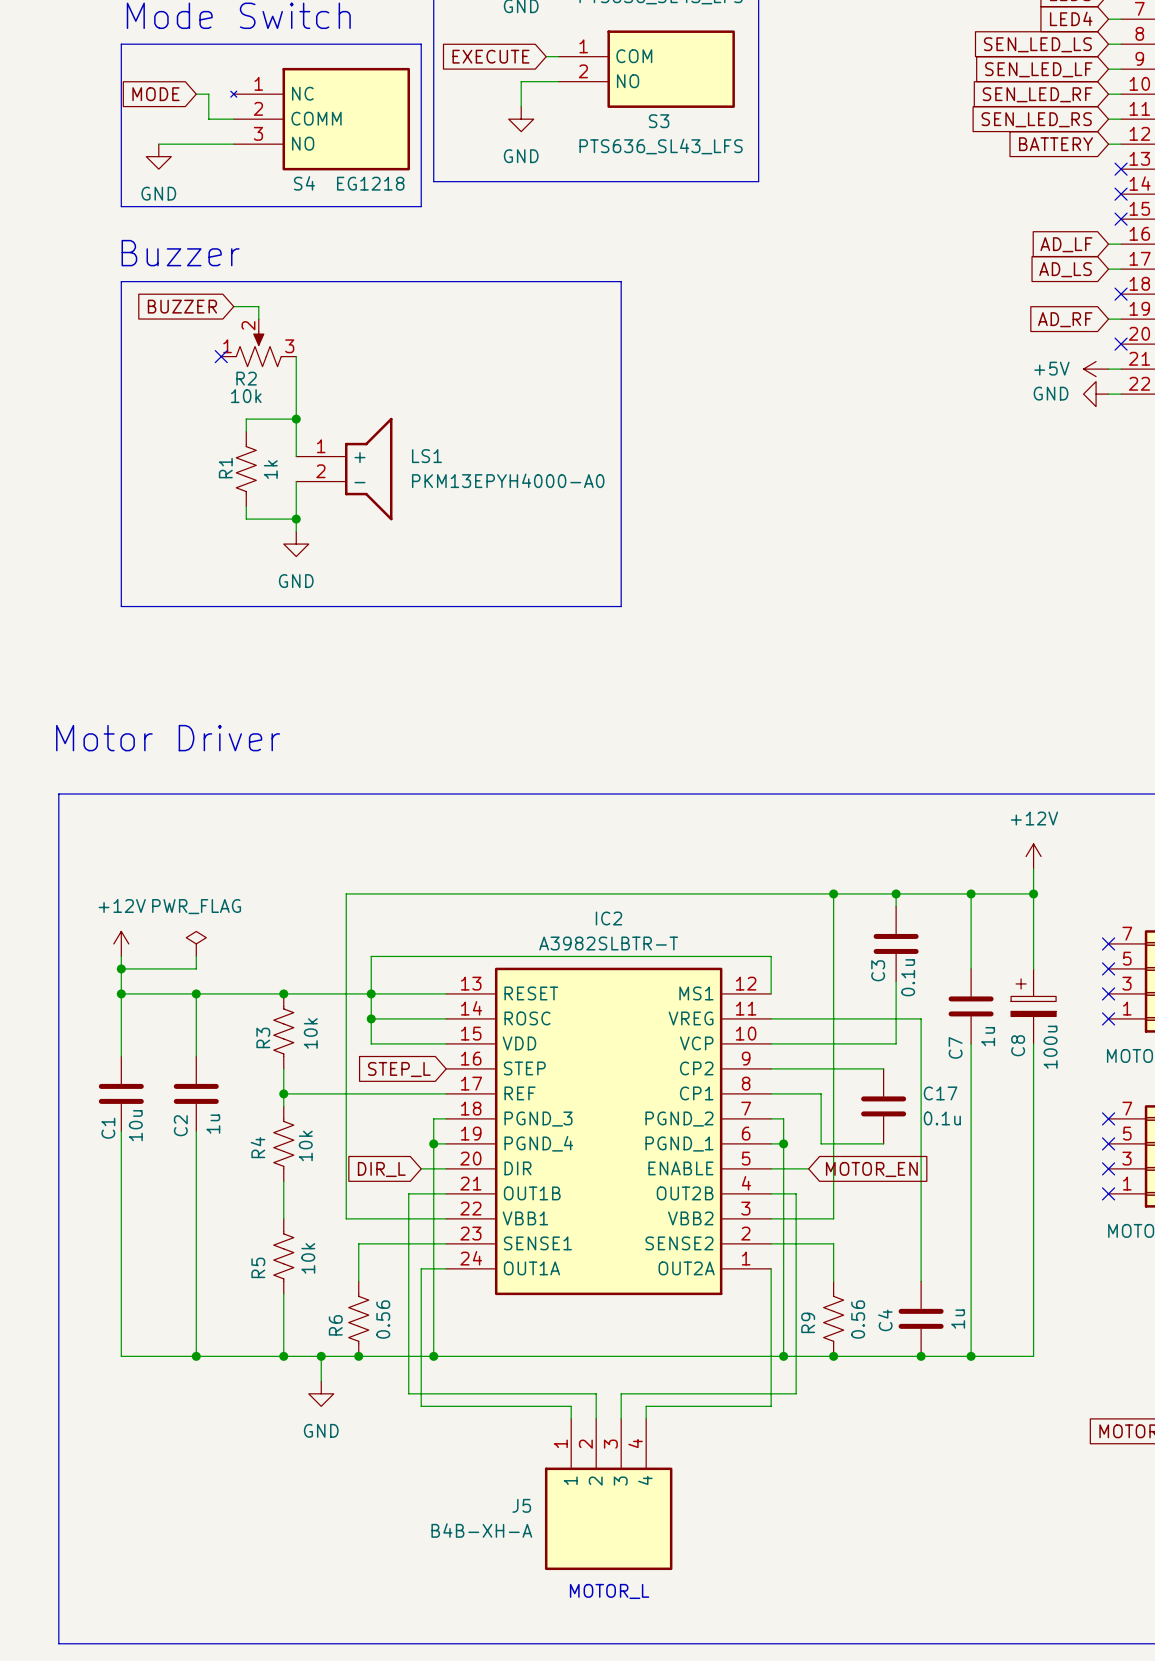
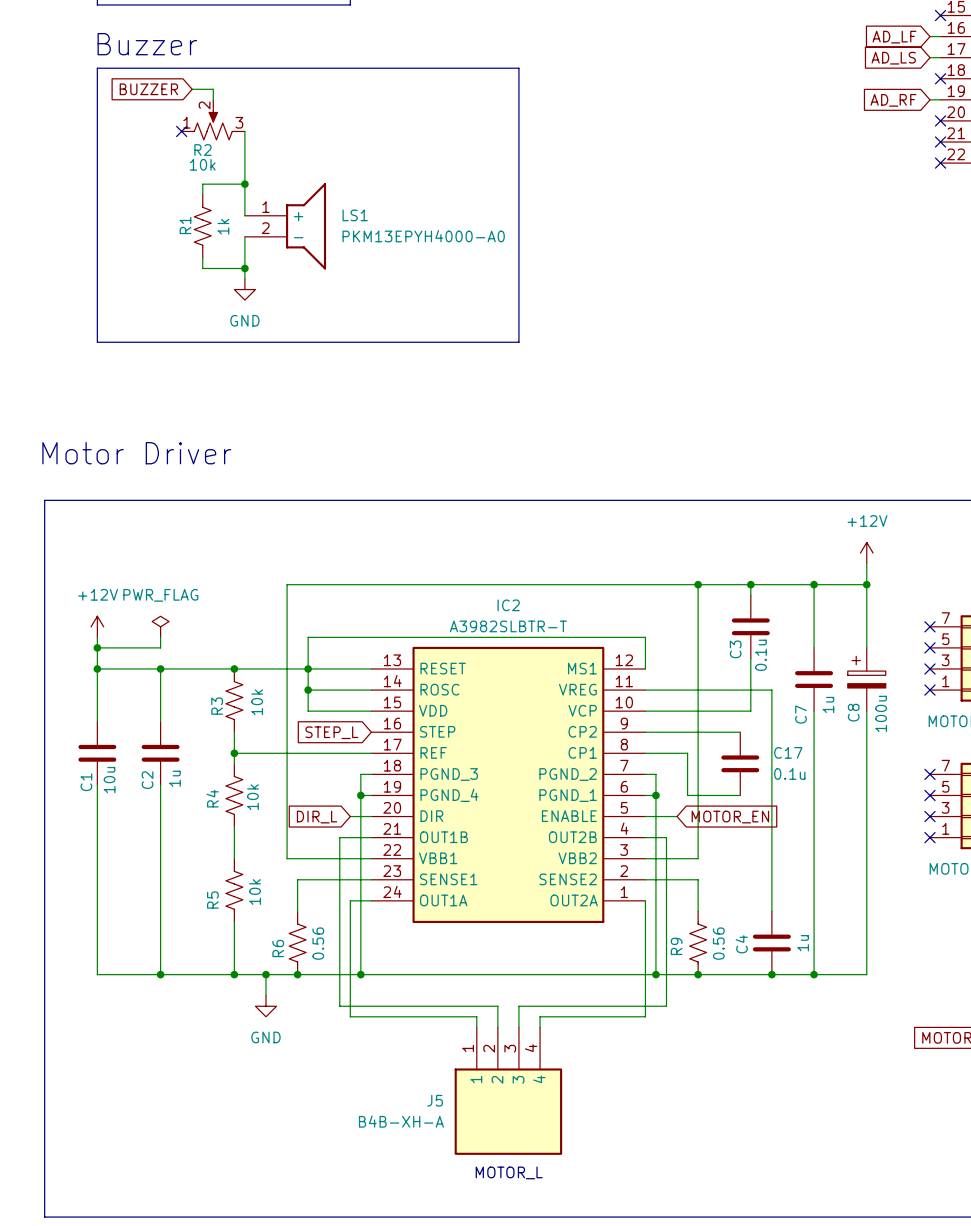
power symbol: +5V (1096, 369) -> none
wire: (1108, 369) (1121, 369) -> none
no-connect mark: none -> (940, 142)
power symbol: GND (1096, 394) -> none
wire: (1108, 394) (1121, 394) -> none
no-connect mark: none -> (940, 163)

